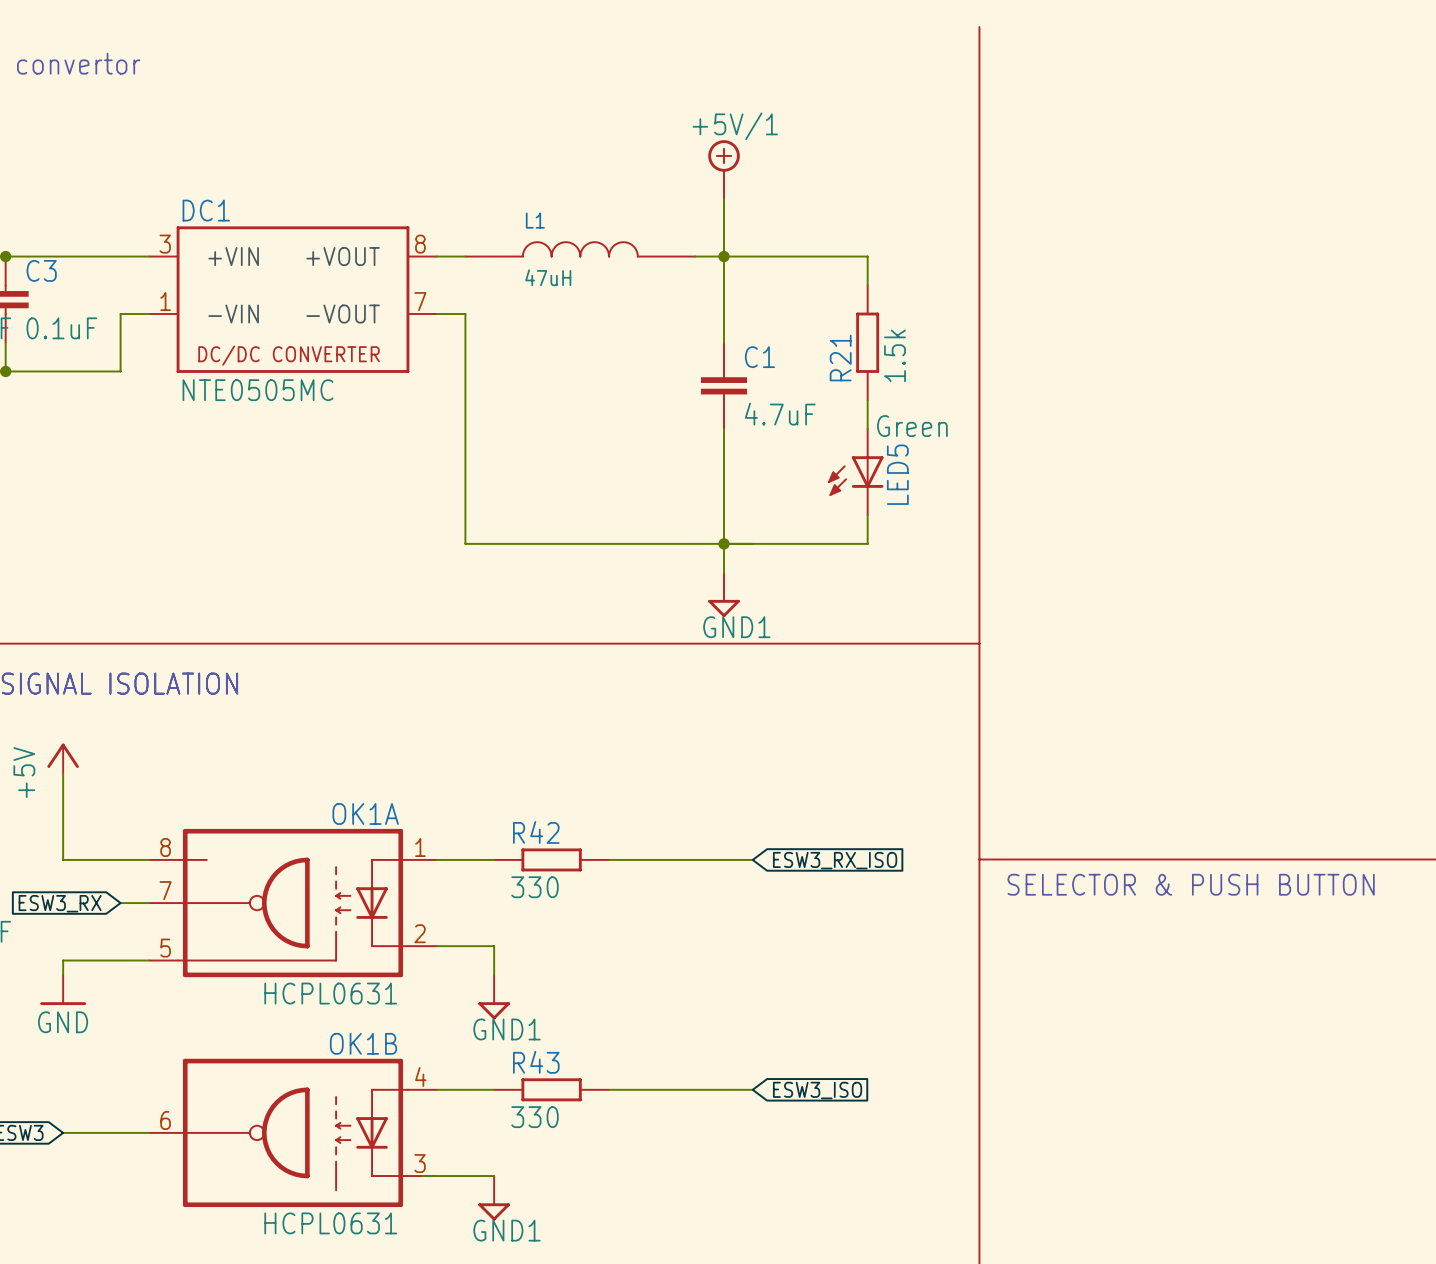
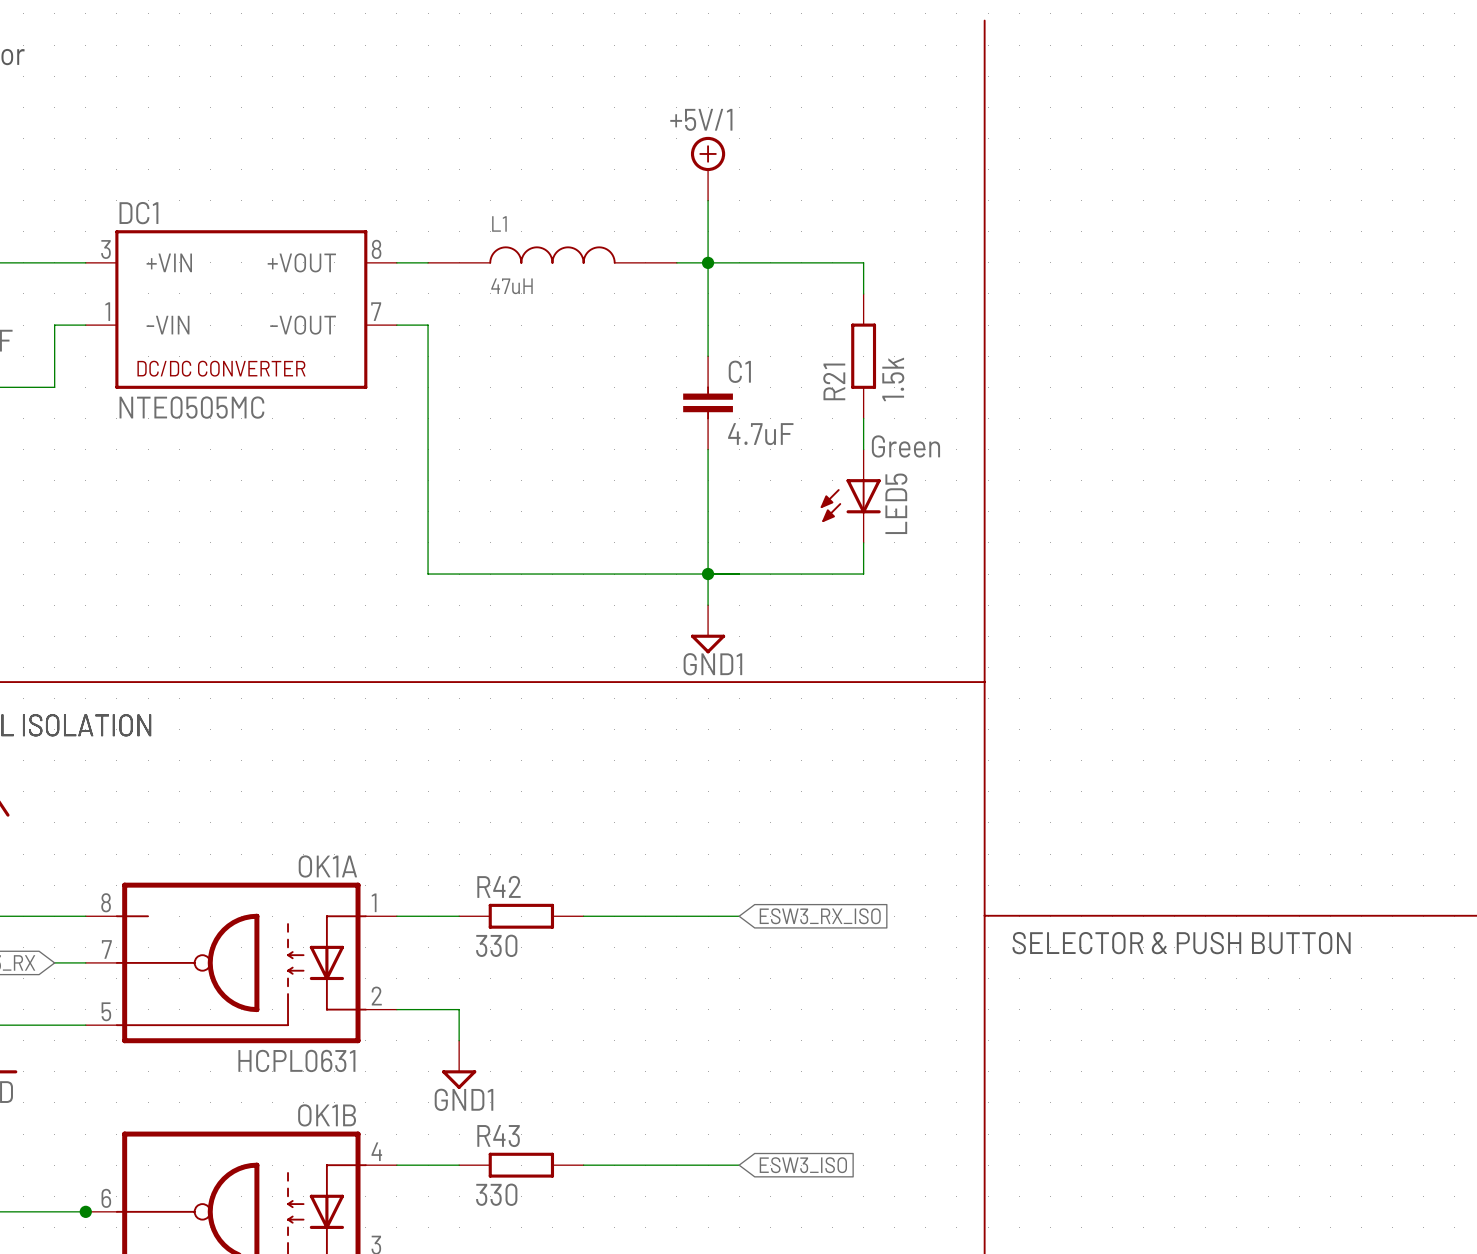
line: (979, 27) (979, 32) -> none
junction: none -> (85, 1211)

